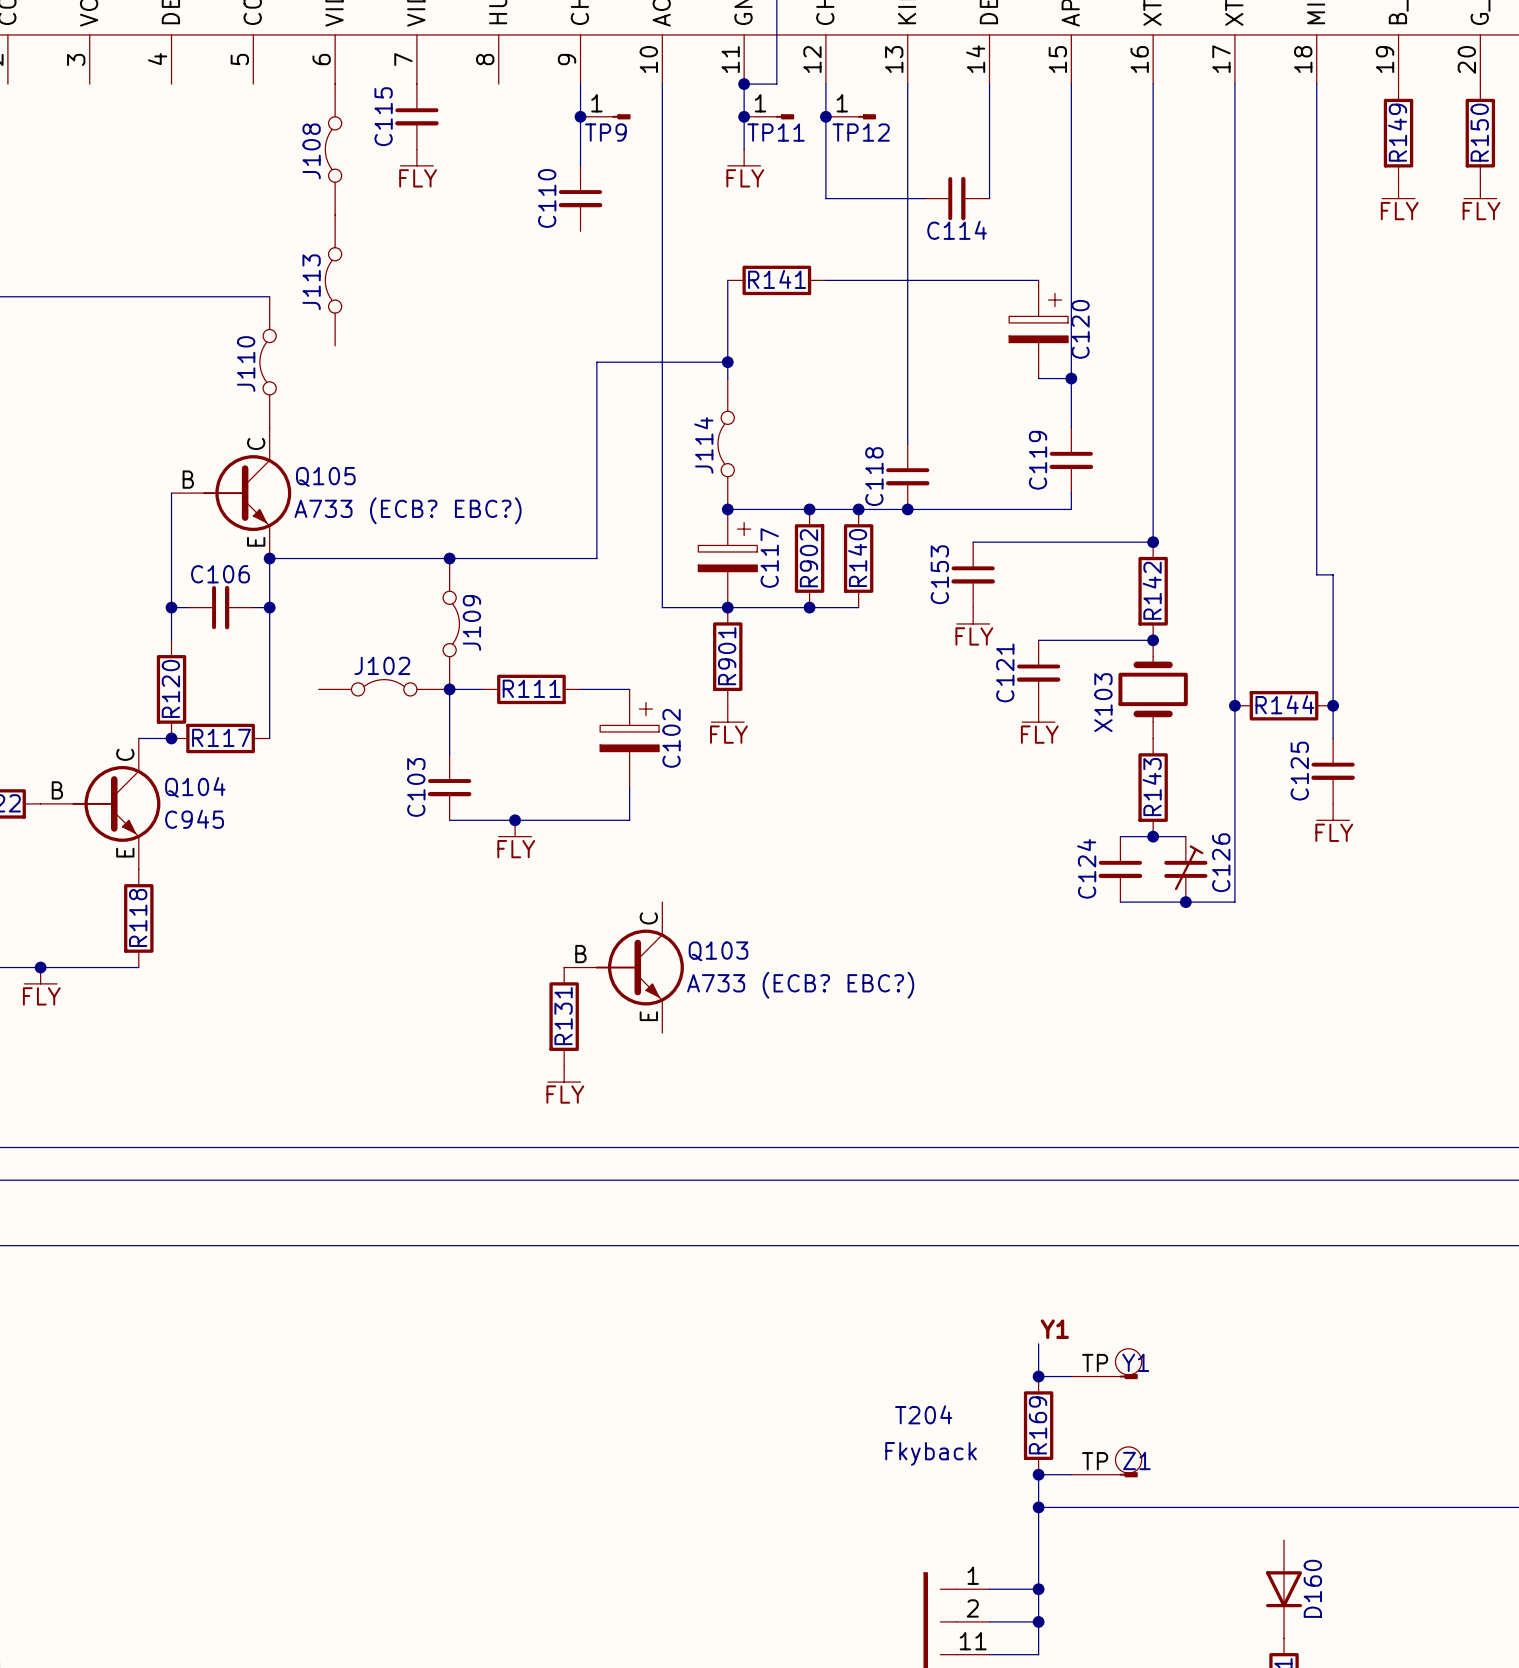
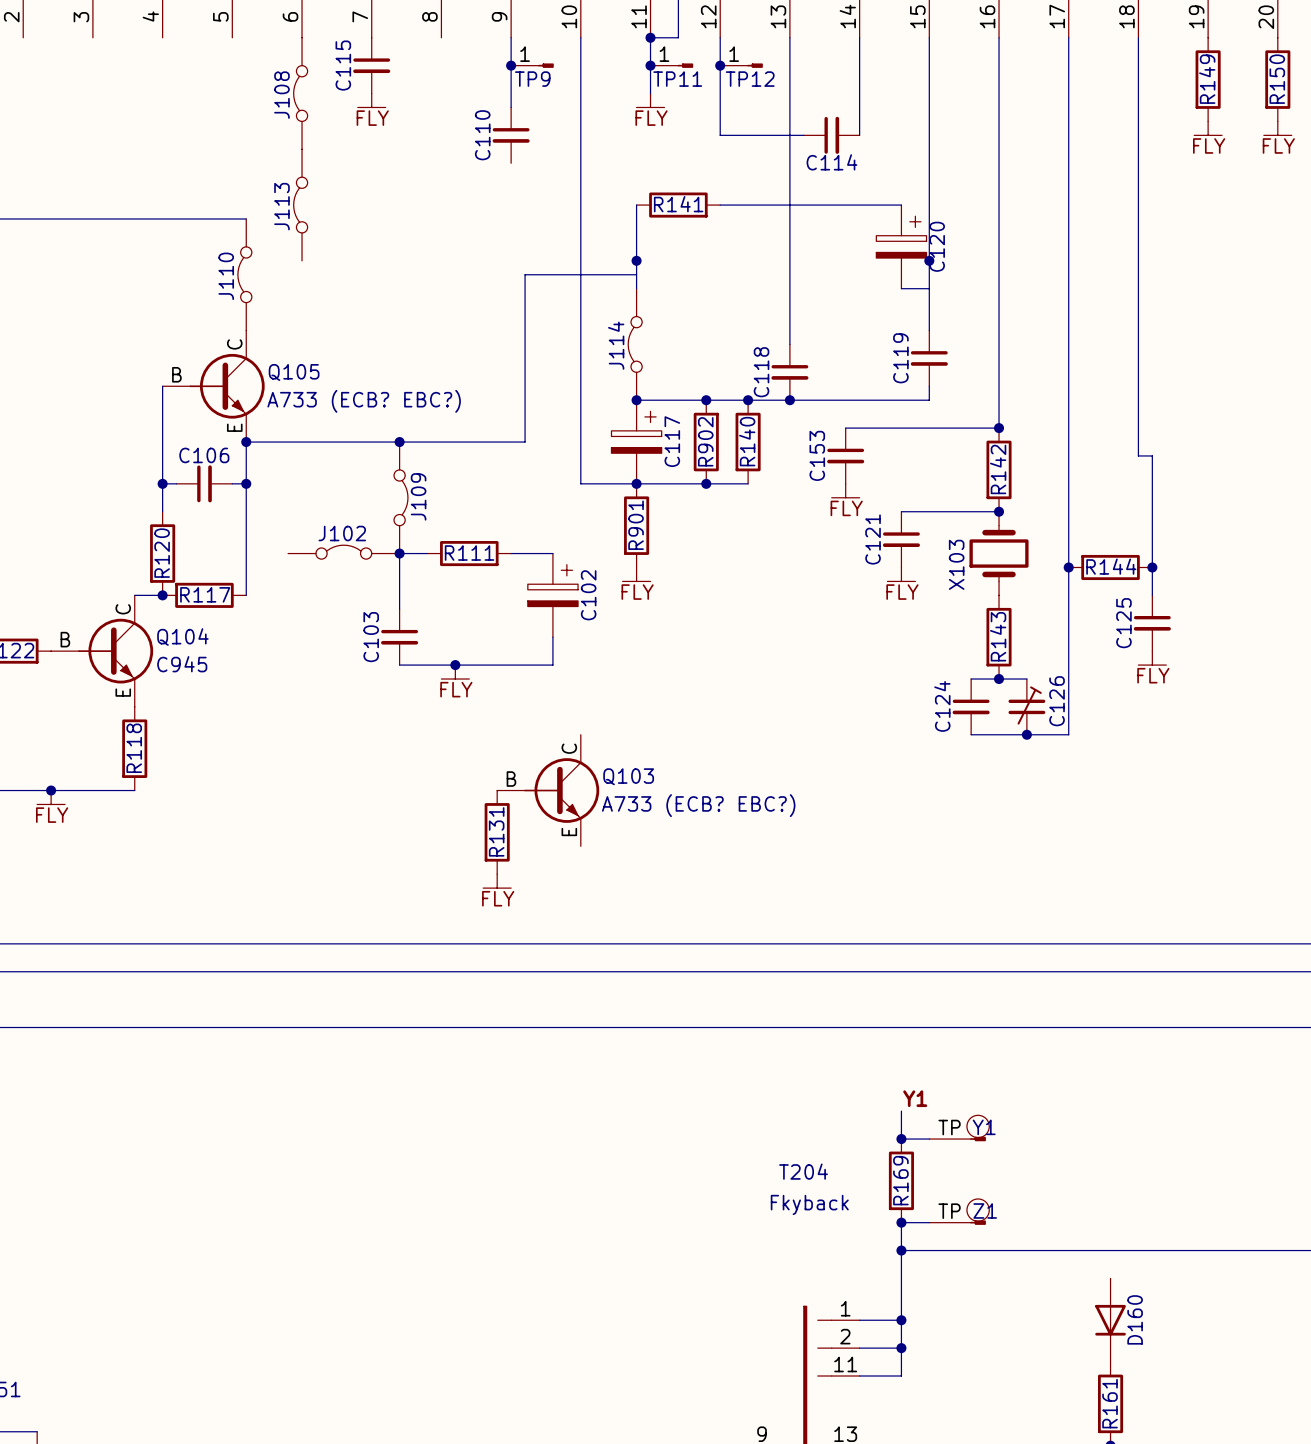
junction position: (727, 362) -> (636, 260)
junction position: (1071, 378) -> (929, 260)

